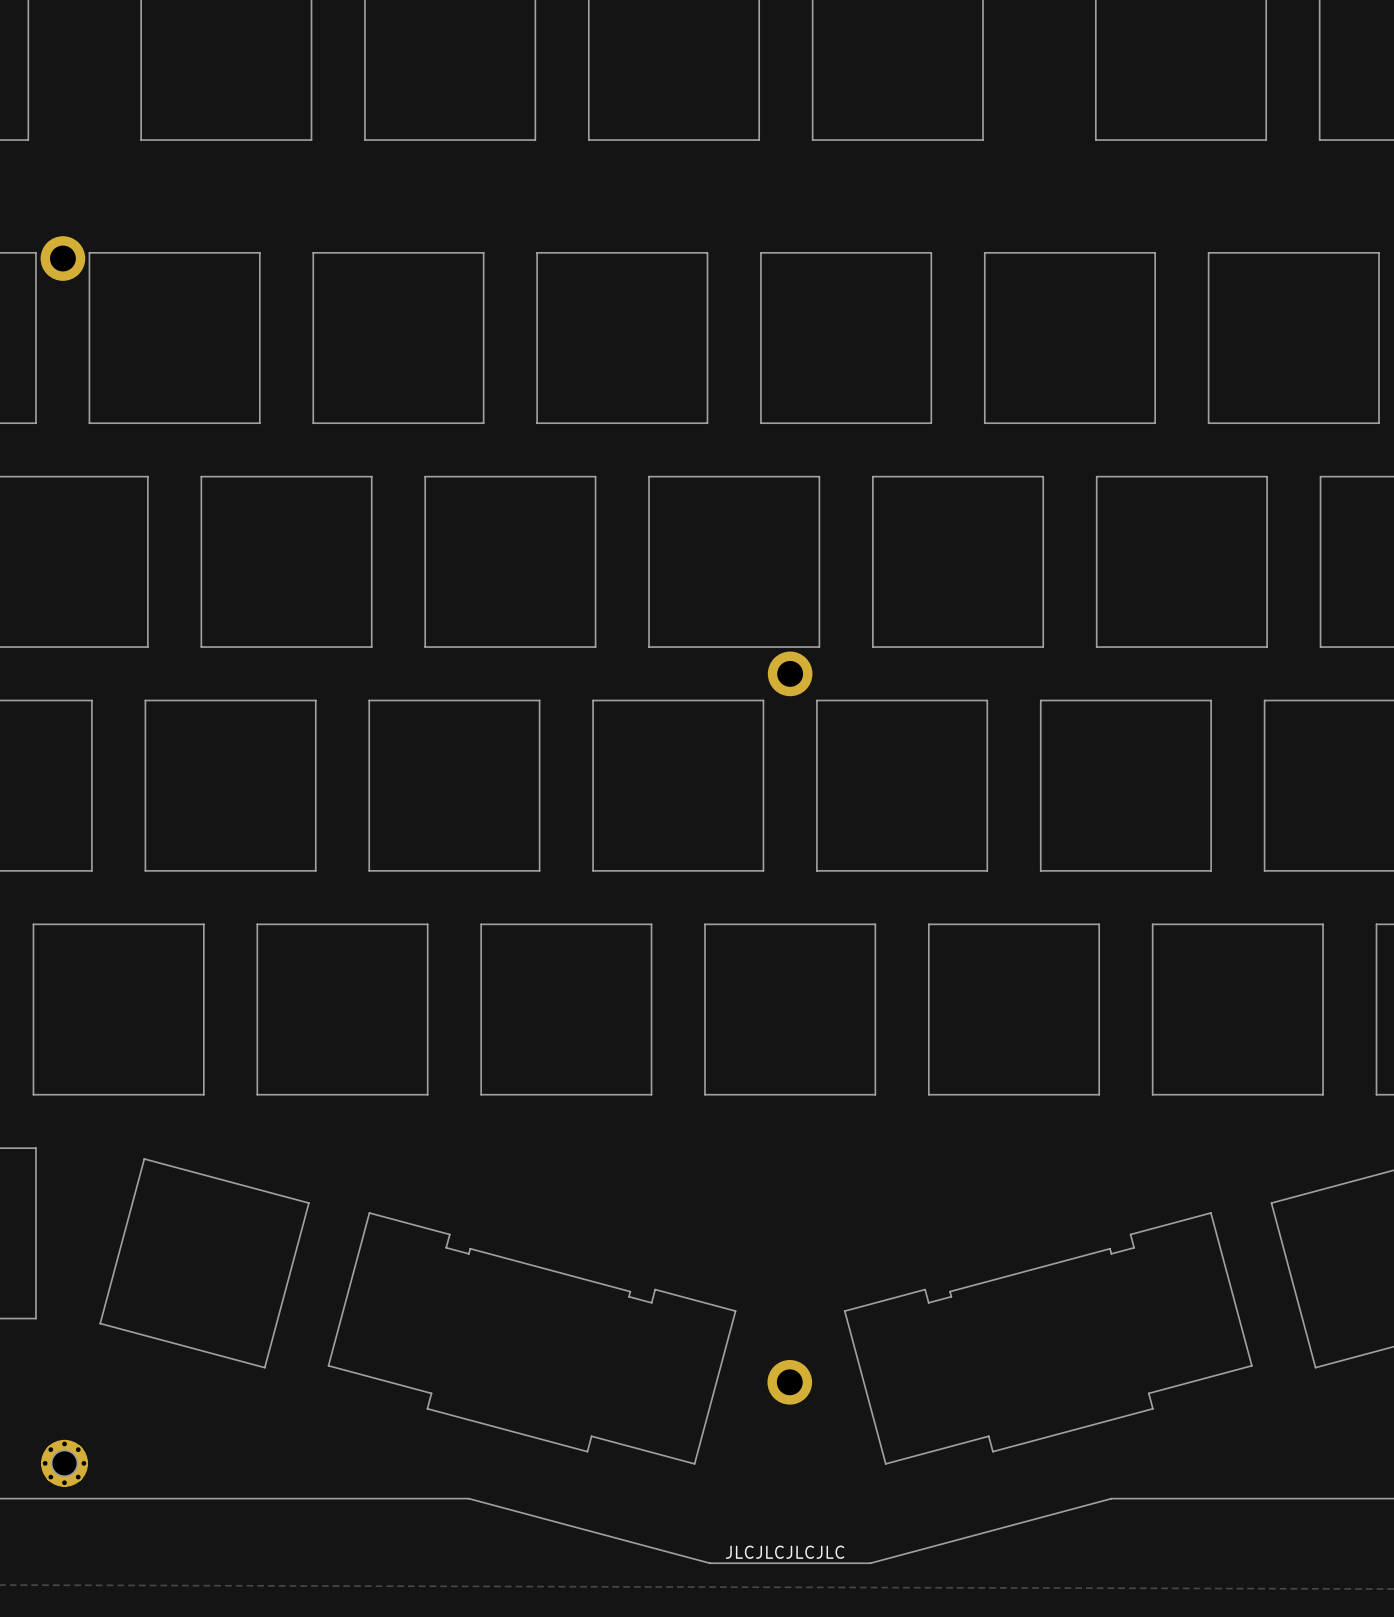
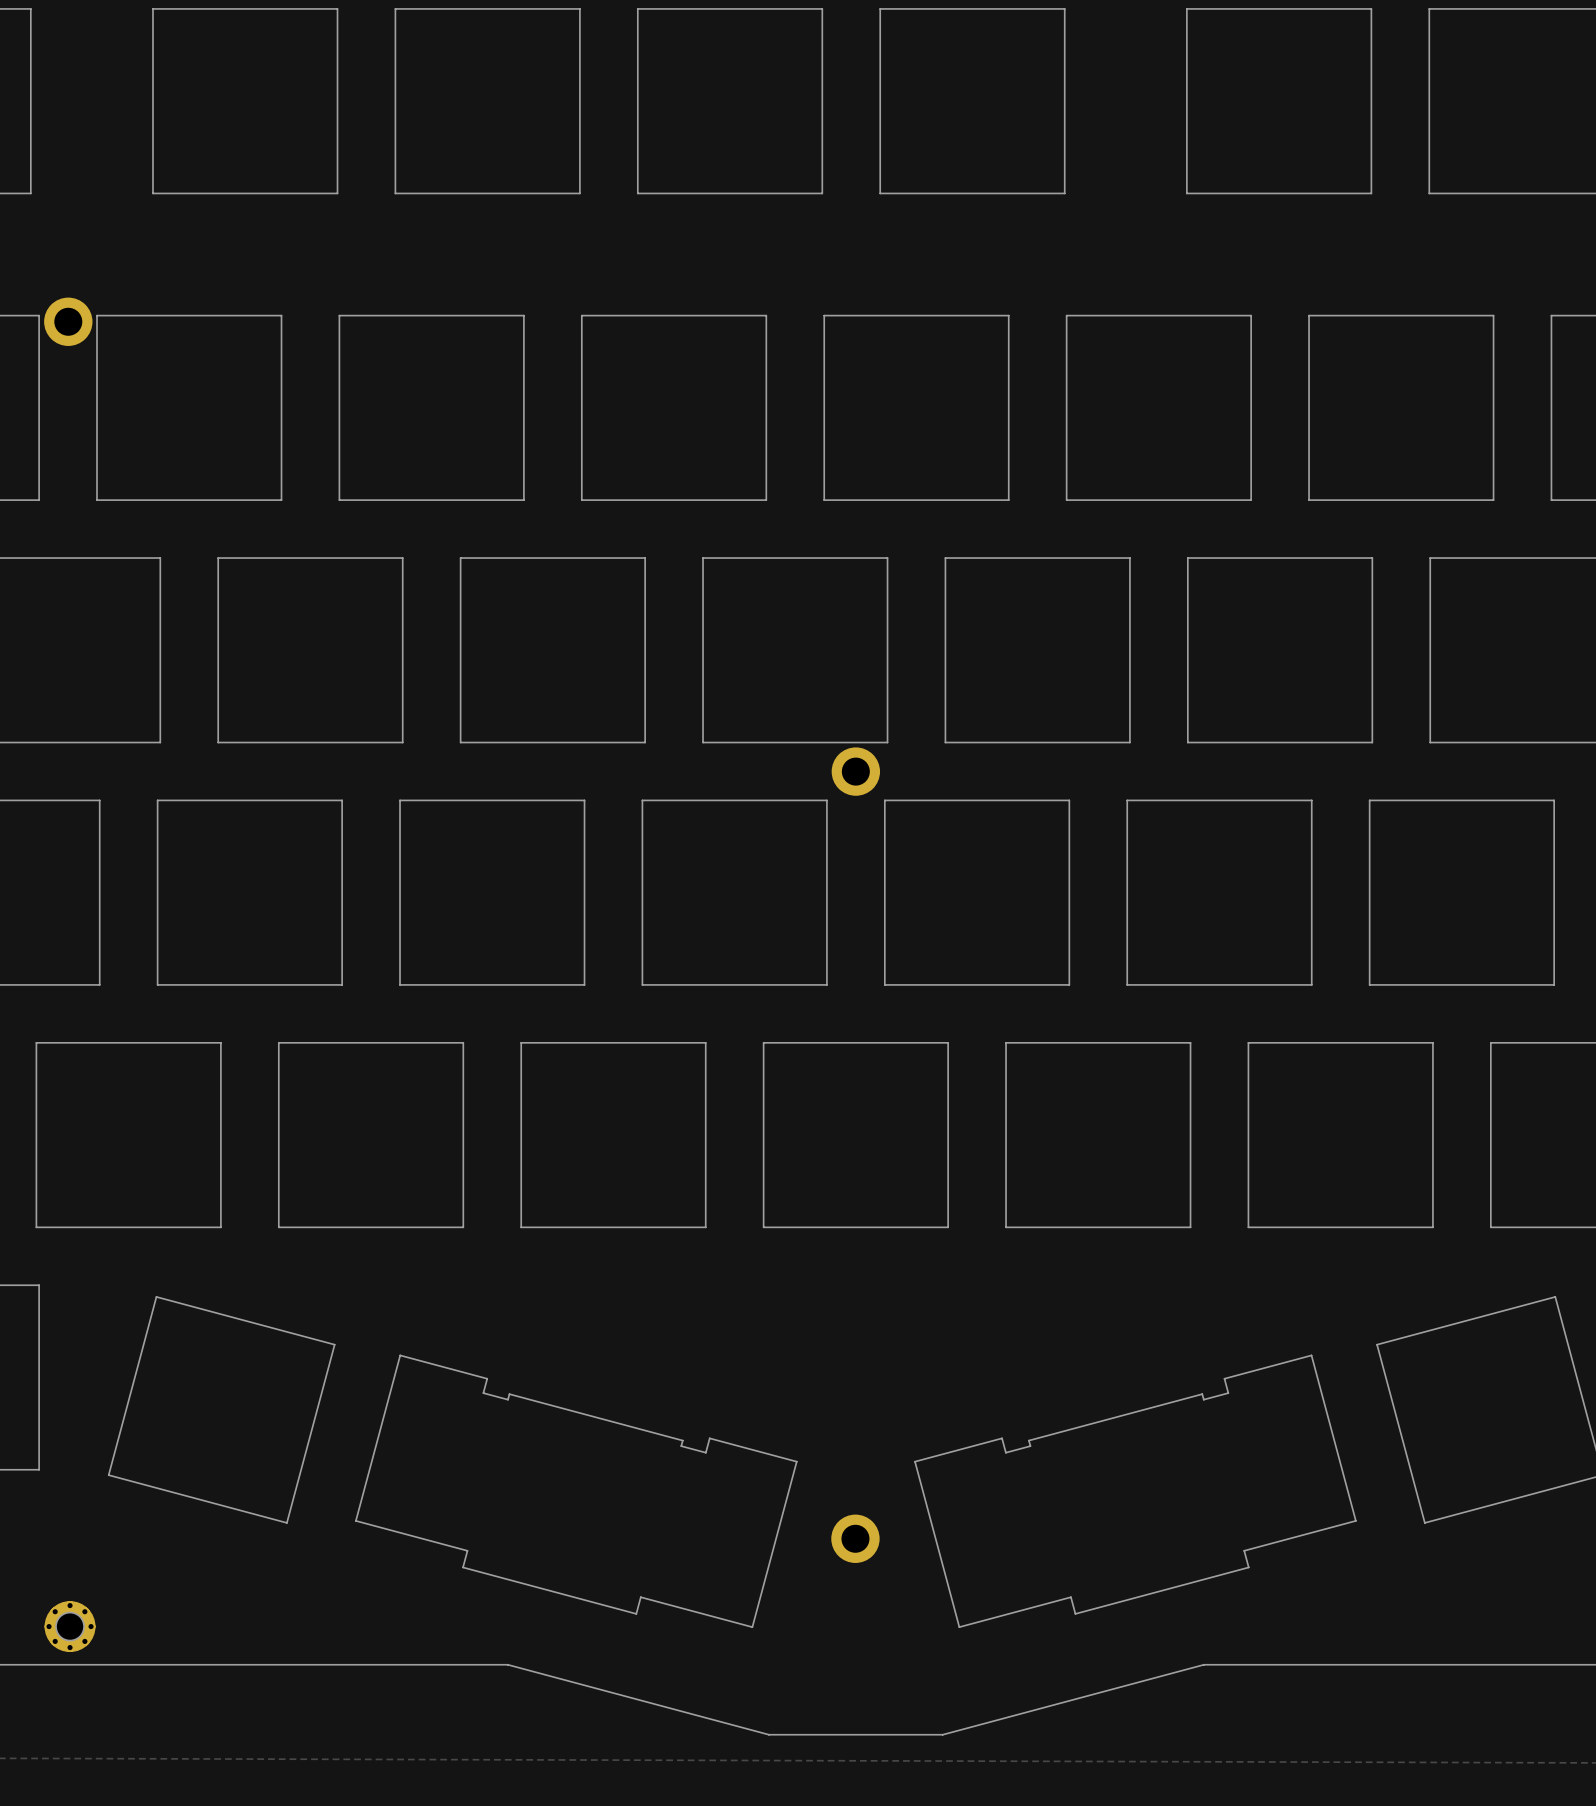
text: JLCJLCJLCJLC (785, 1552) -> none

